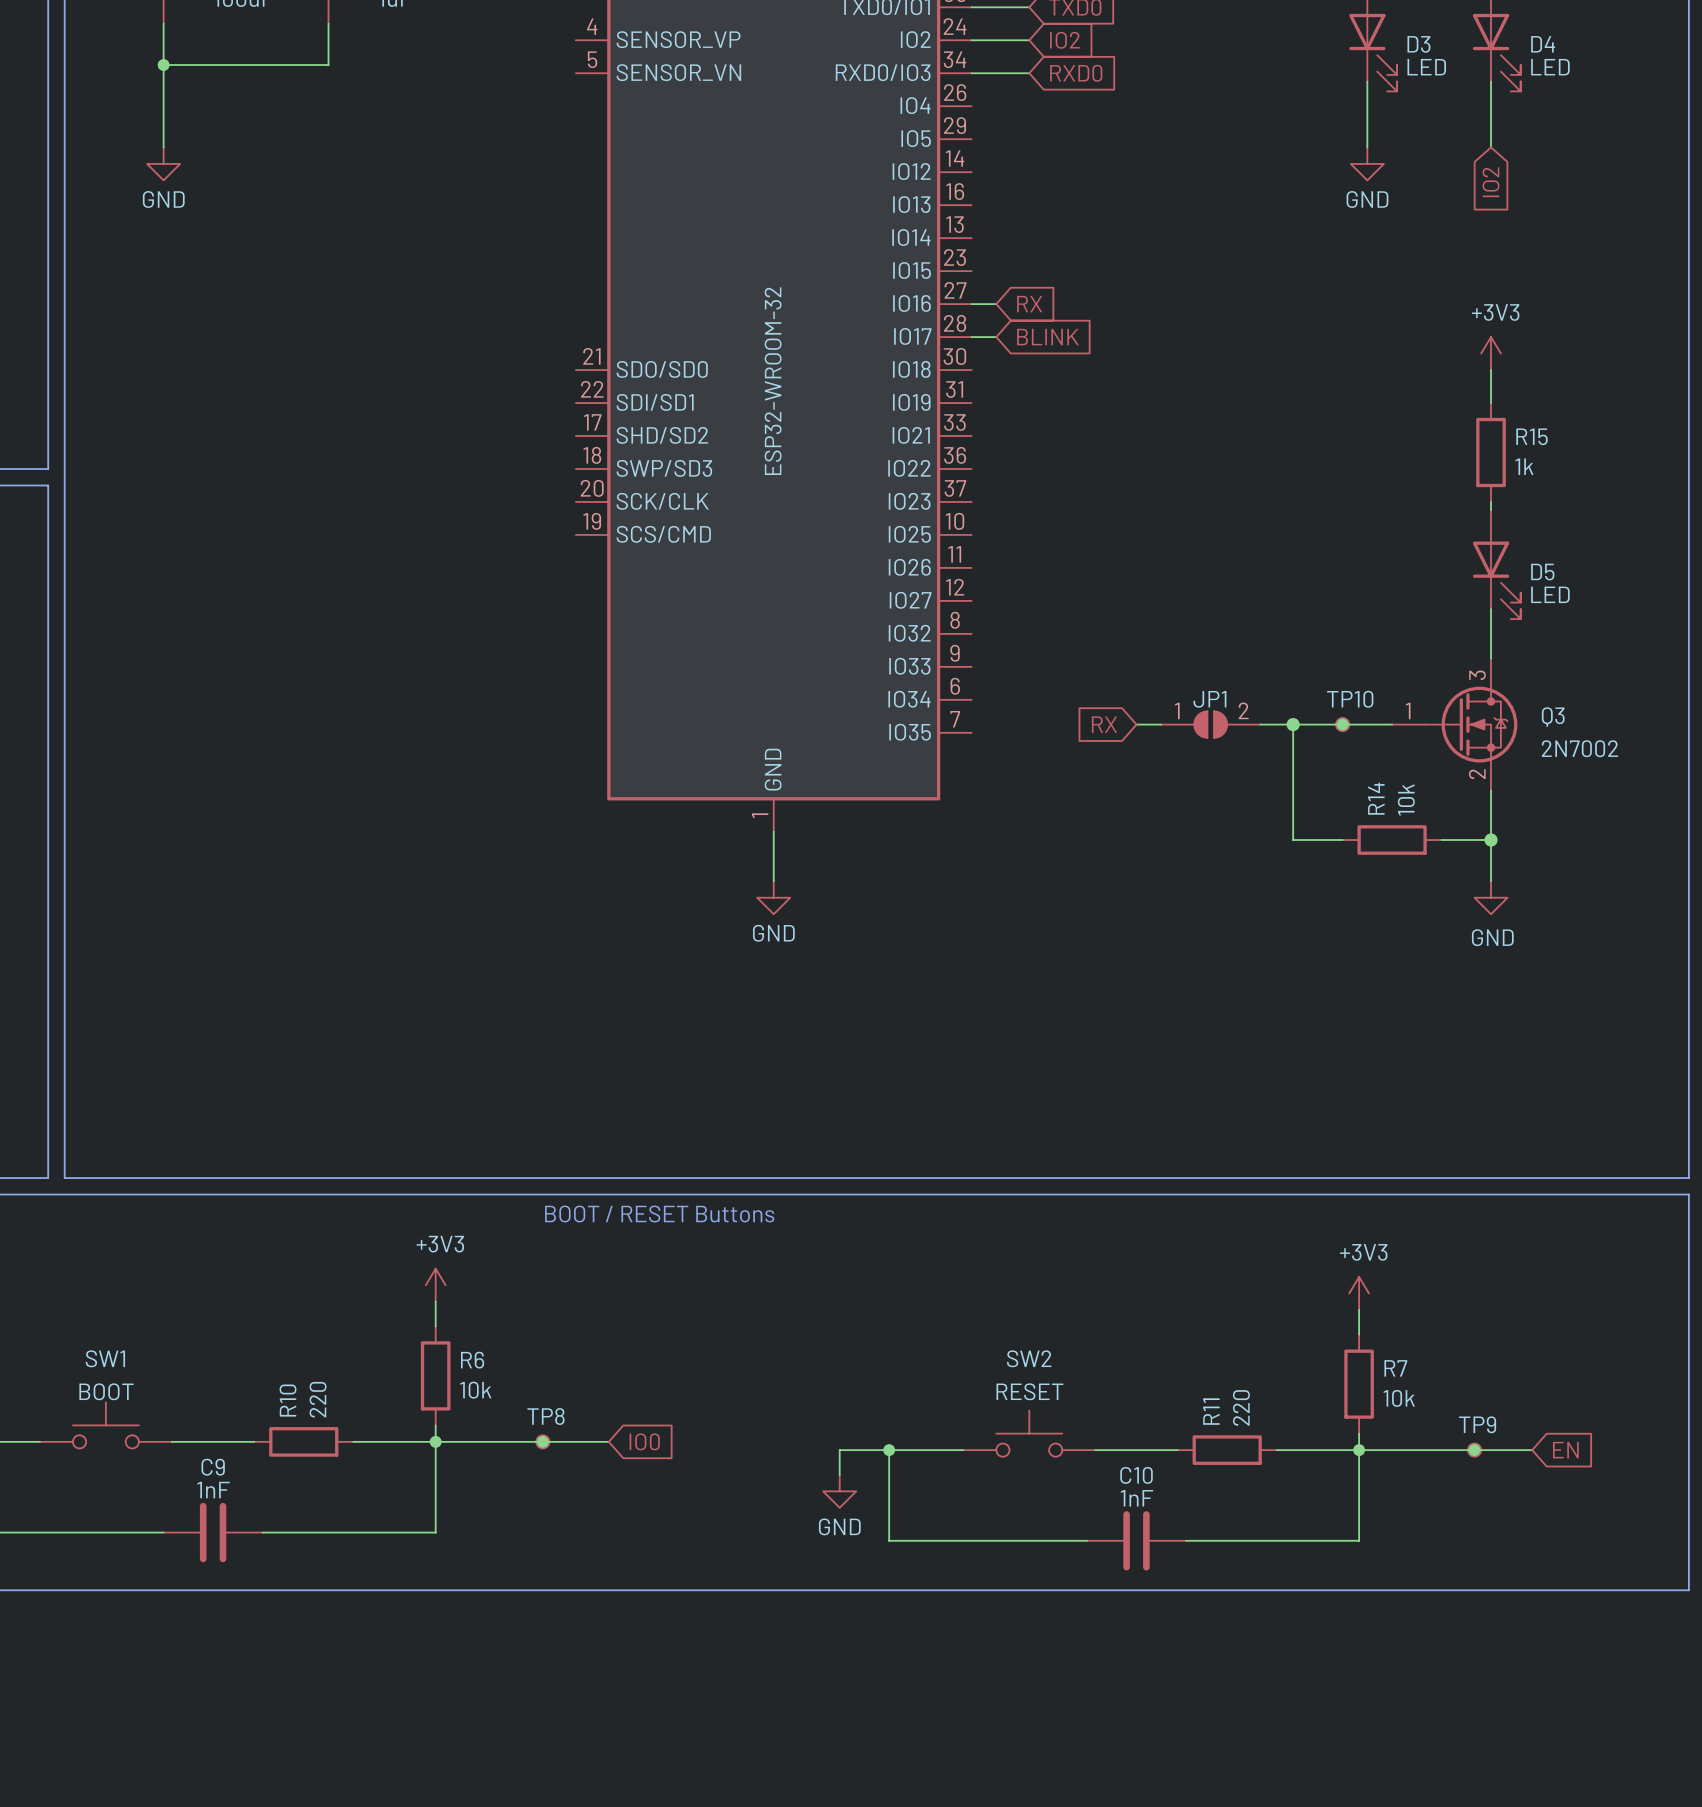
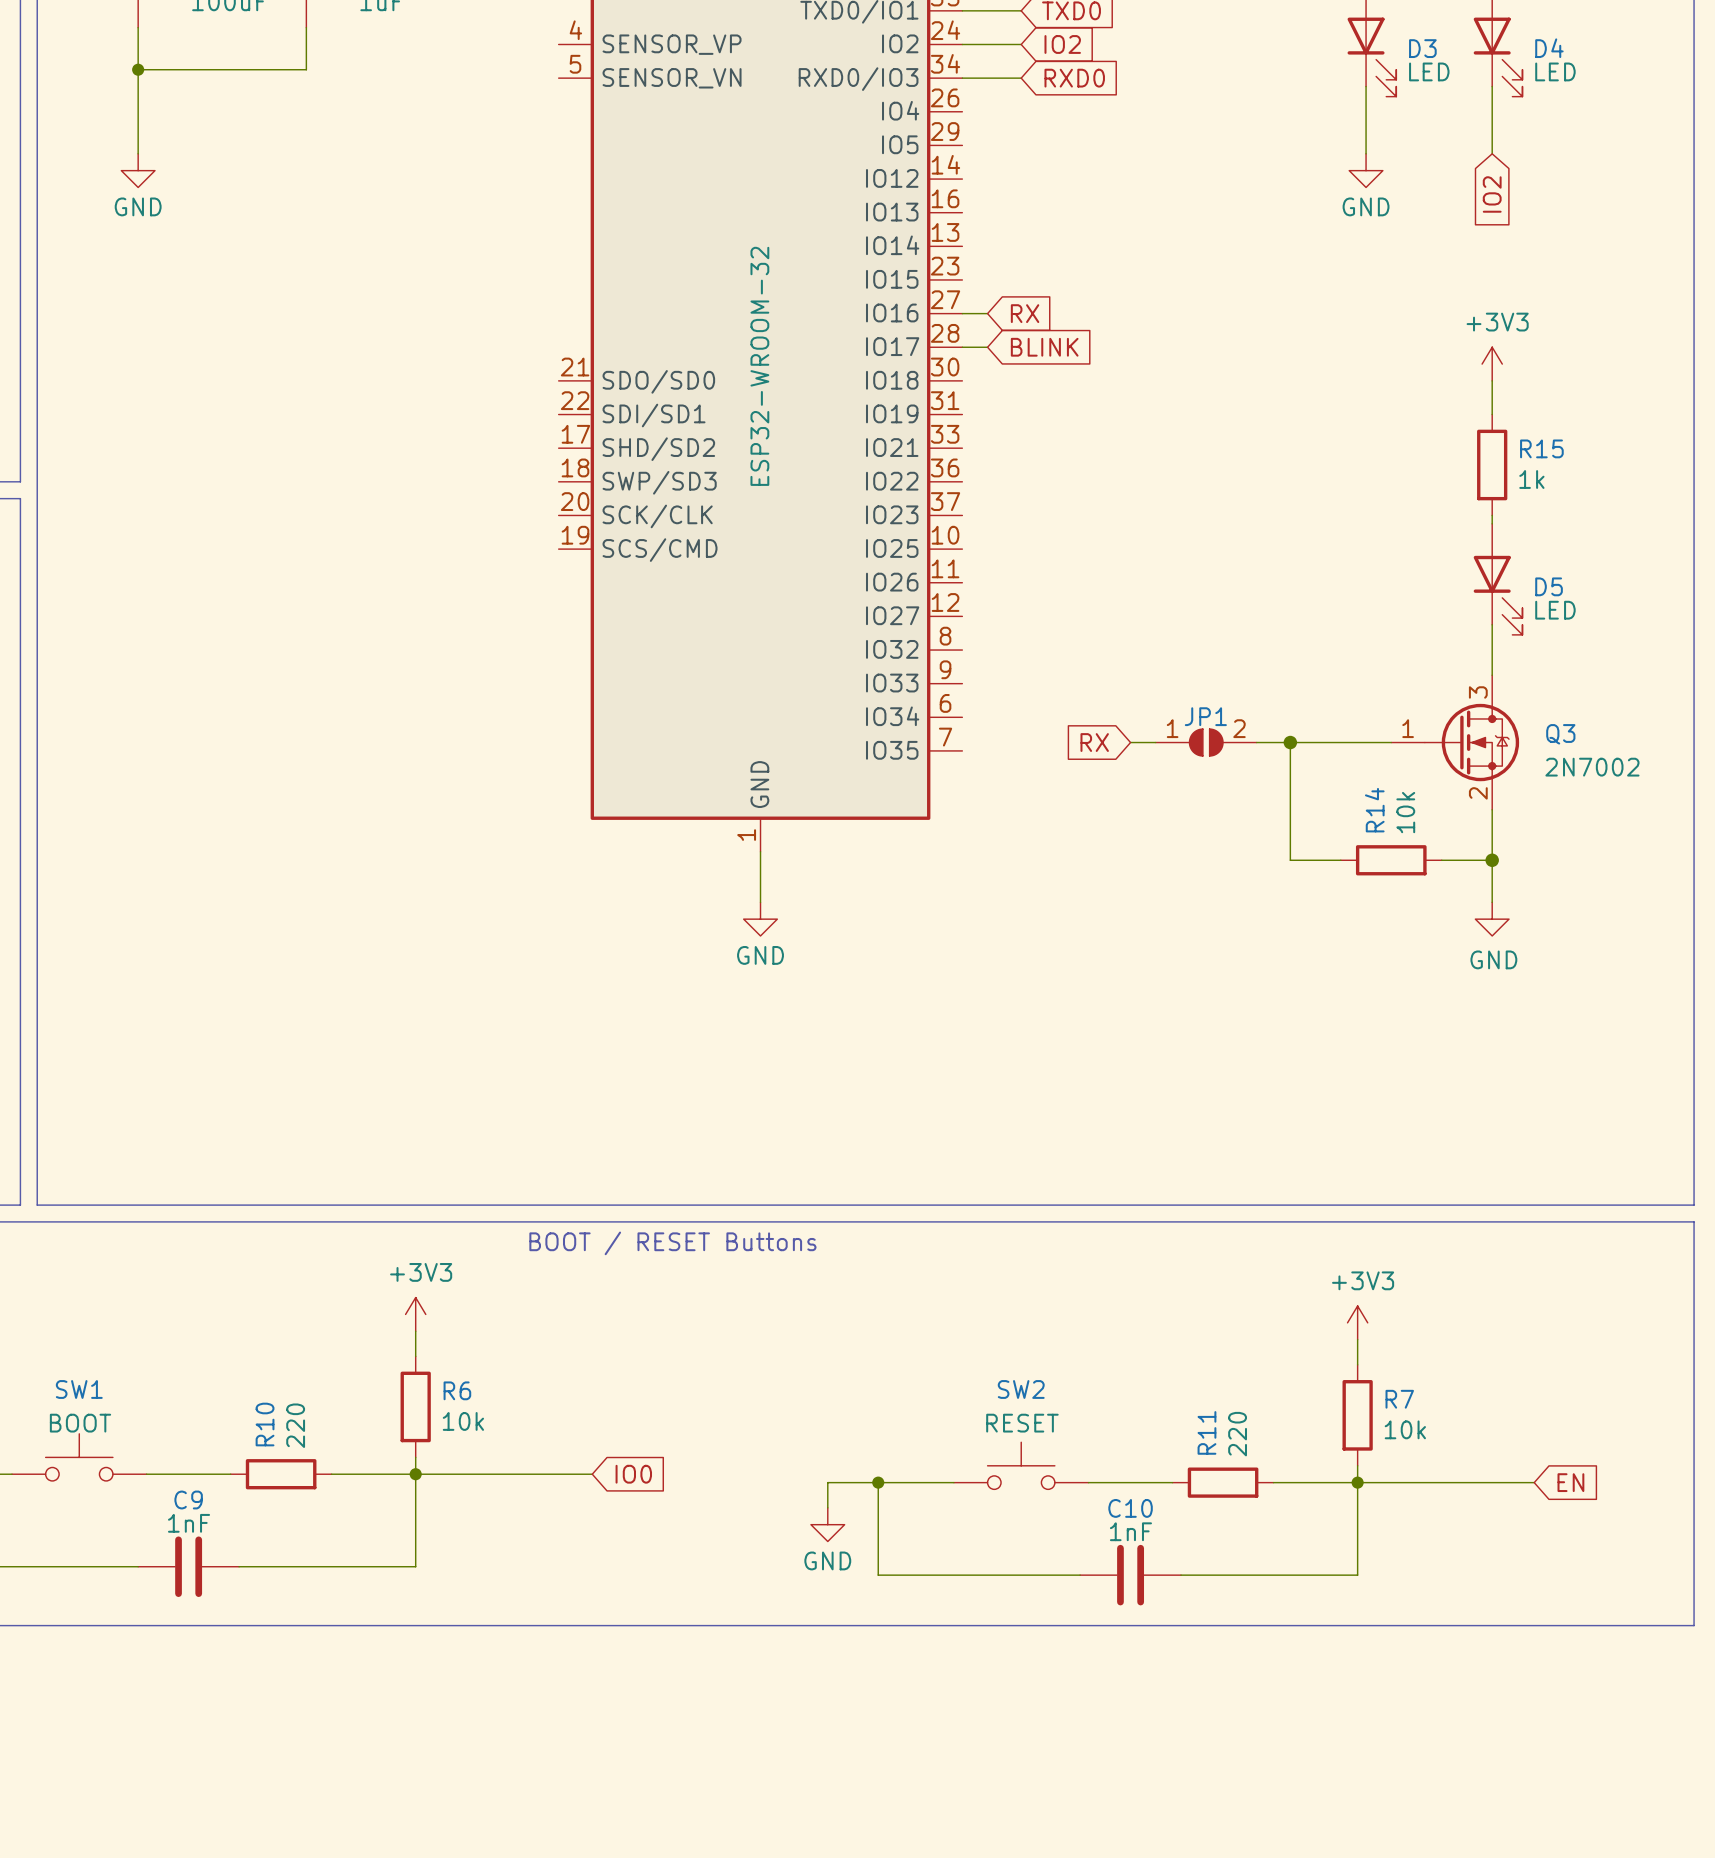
junction: (1342, 724) -> none
TP10: (1342, 724) -> none
junction: (542, 1441) -> none
TP8: (542, 1441) -> none
junction: (1474, 1450) -> none
TP9: (1474, 1450) -> none

